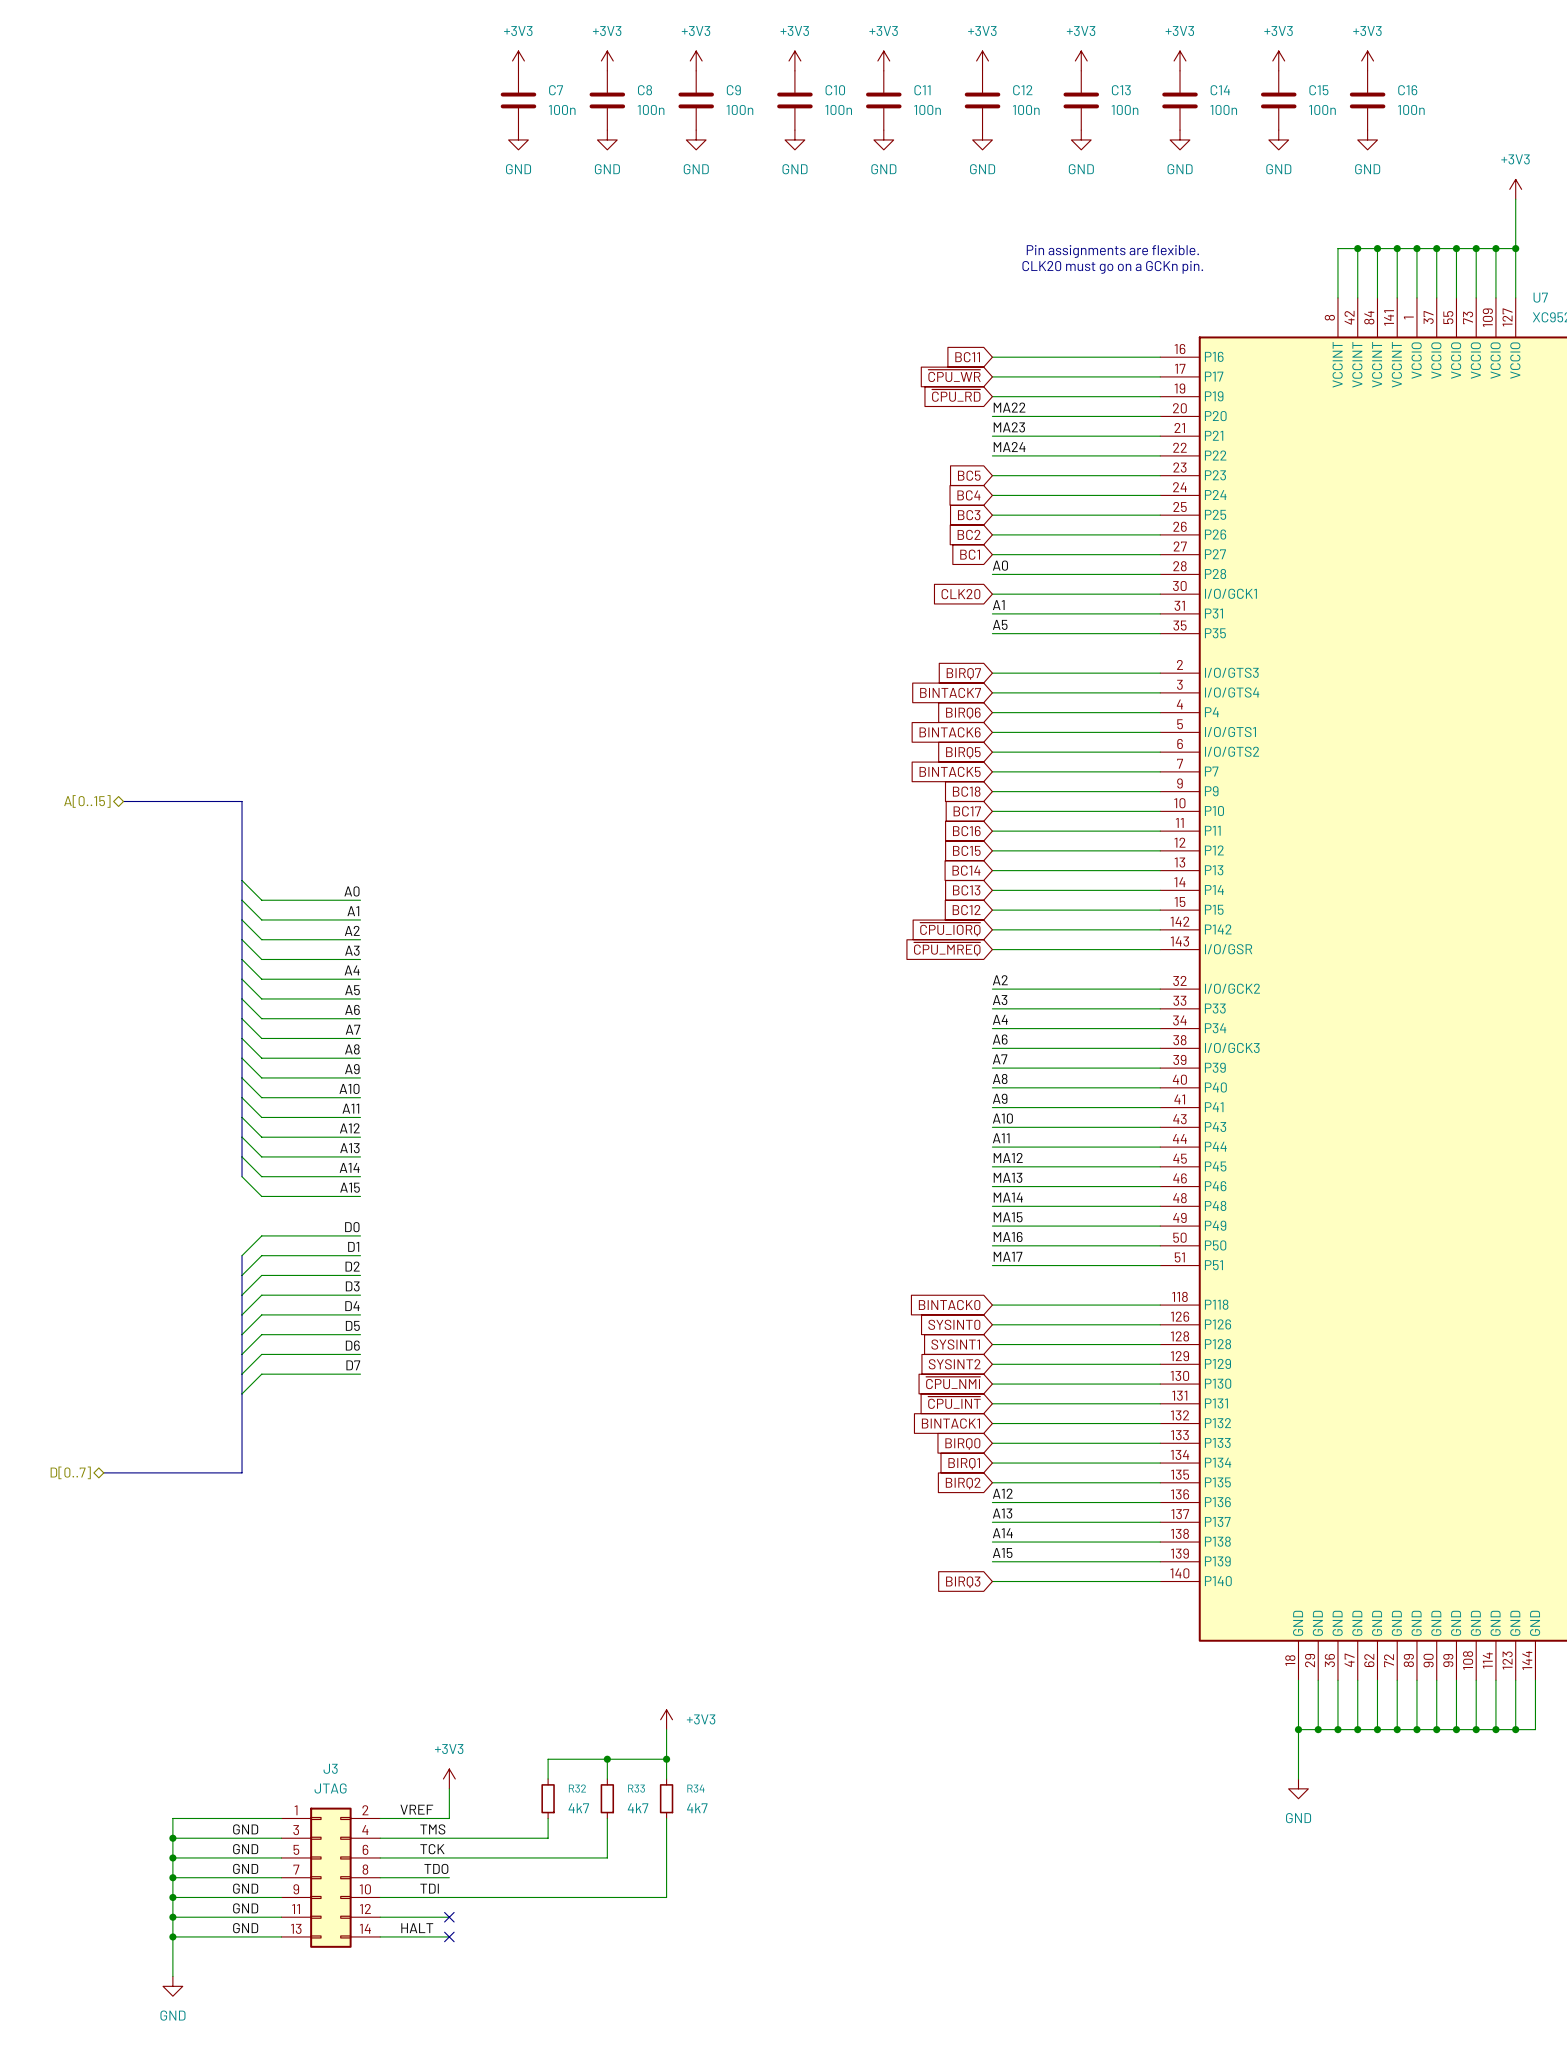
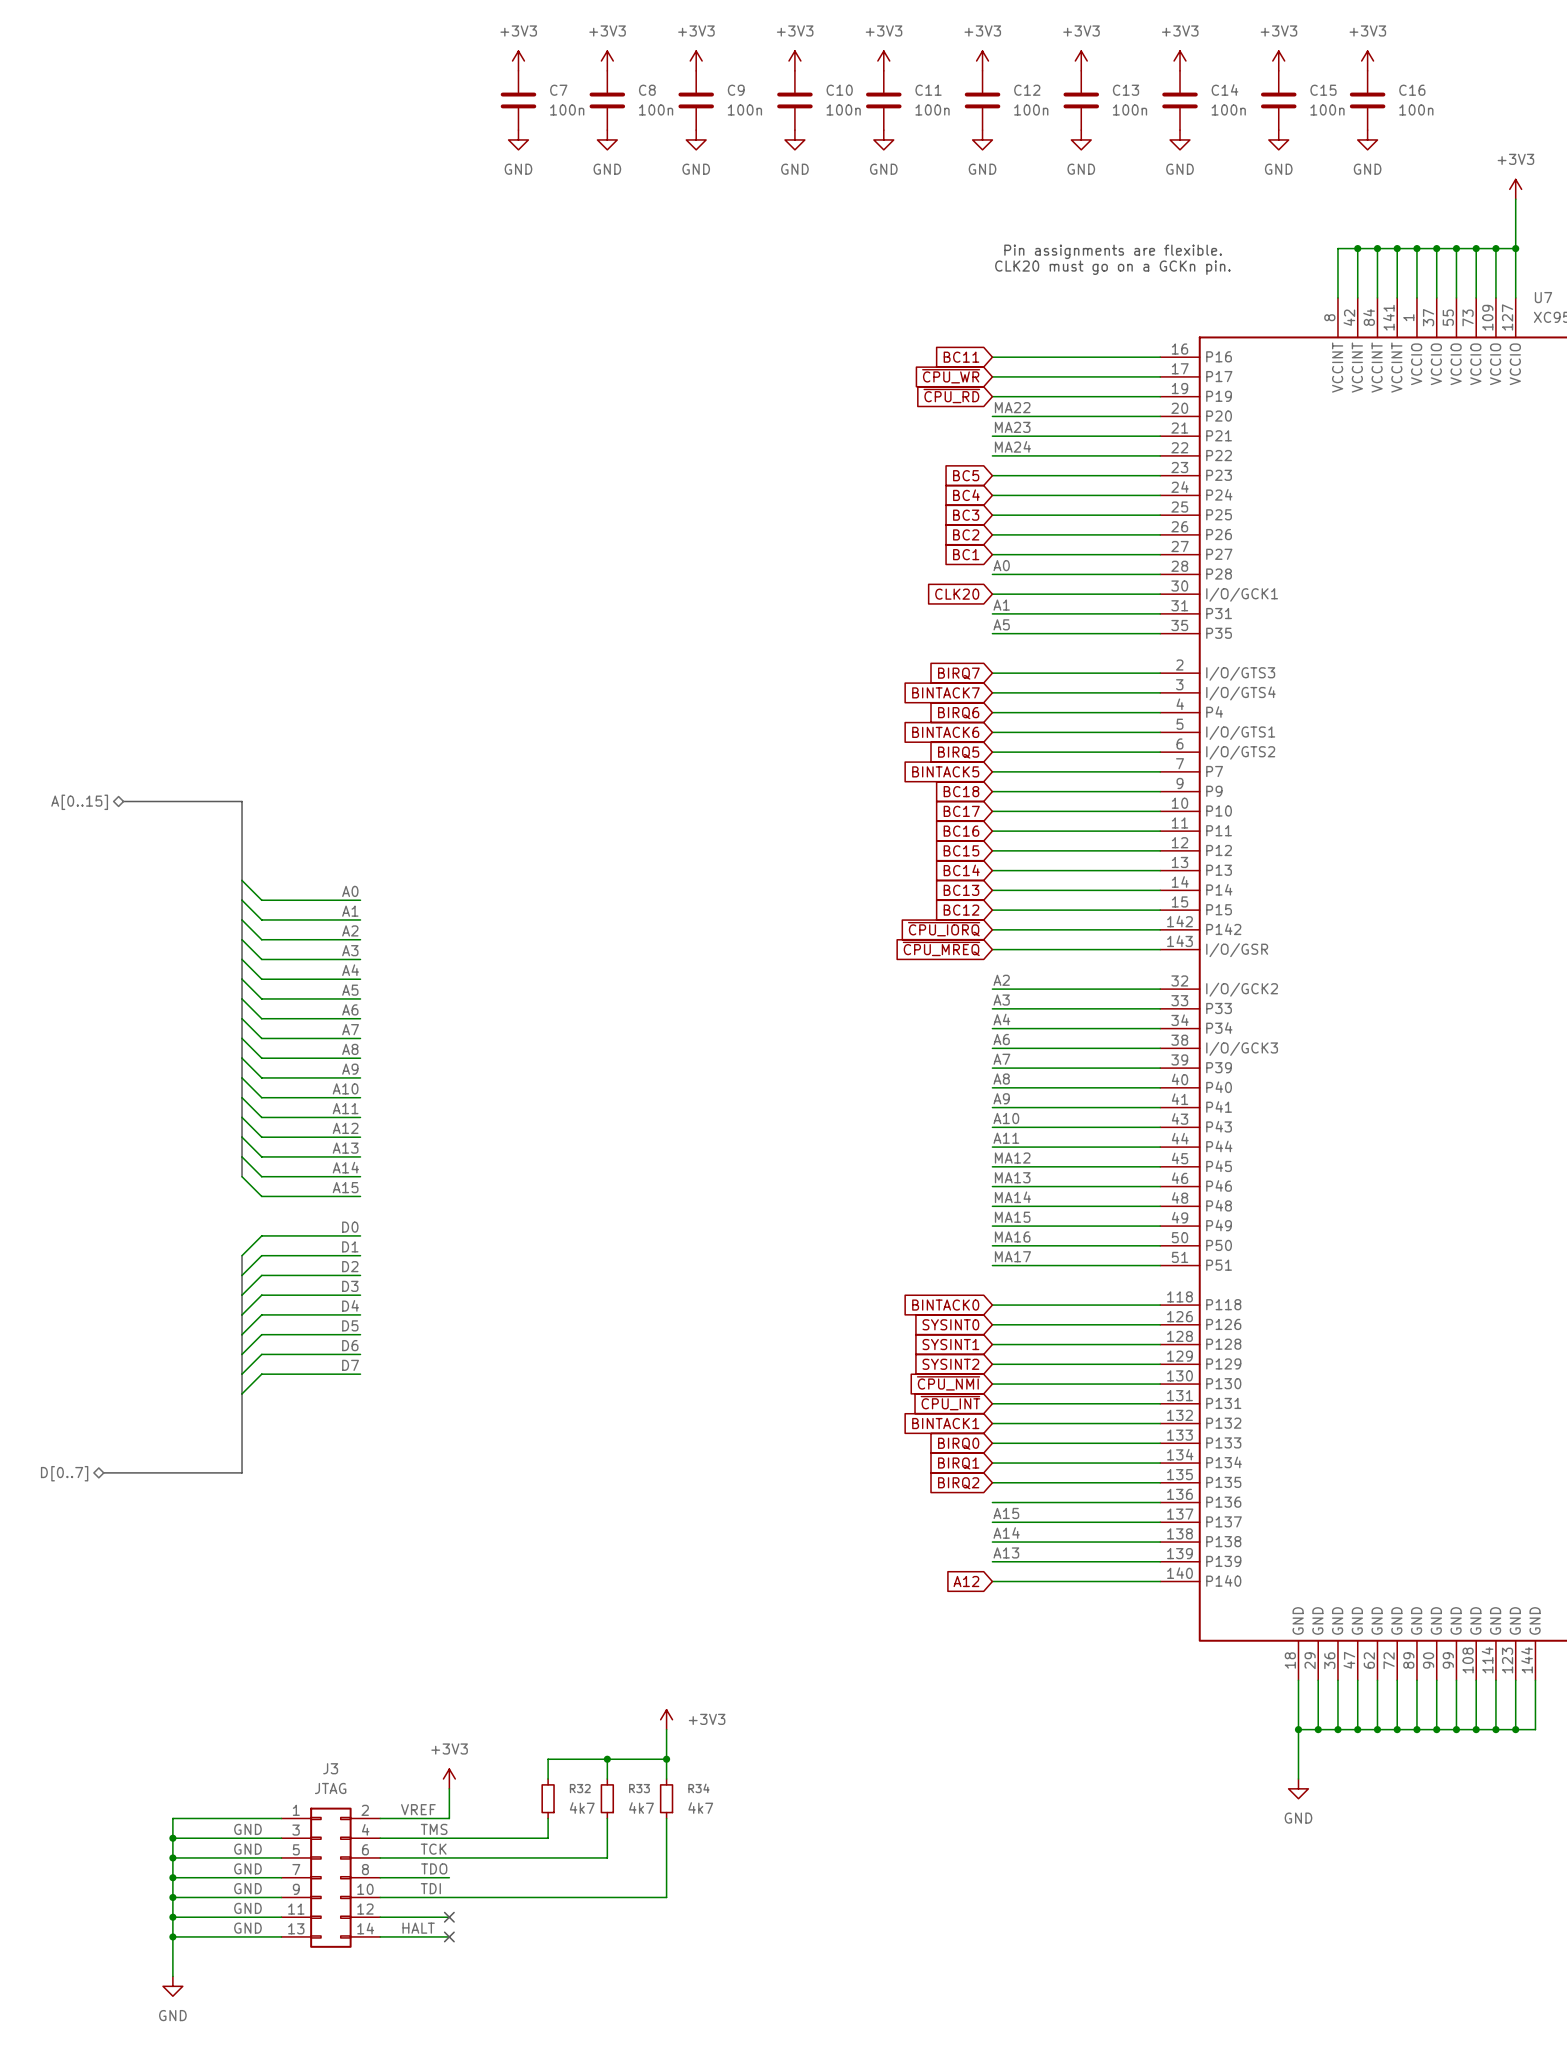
label: A12 (1002, 1493) -> none
label: A13 (1002, 1513) -> A15 (1006, 1513)
label: A15 (1002, 1553) -> A13 (1006, 1552)
global label: BIRQ3 (963, 1582) -> A12 (966, 1581)

